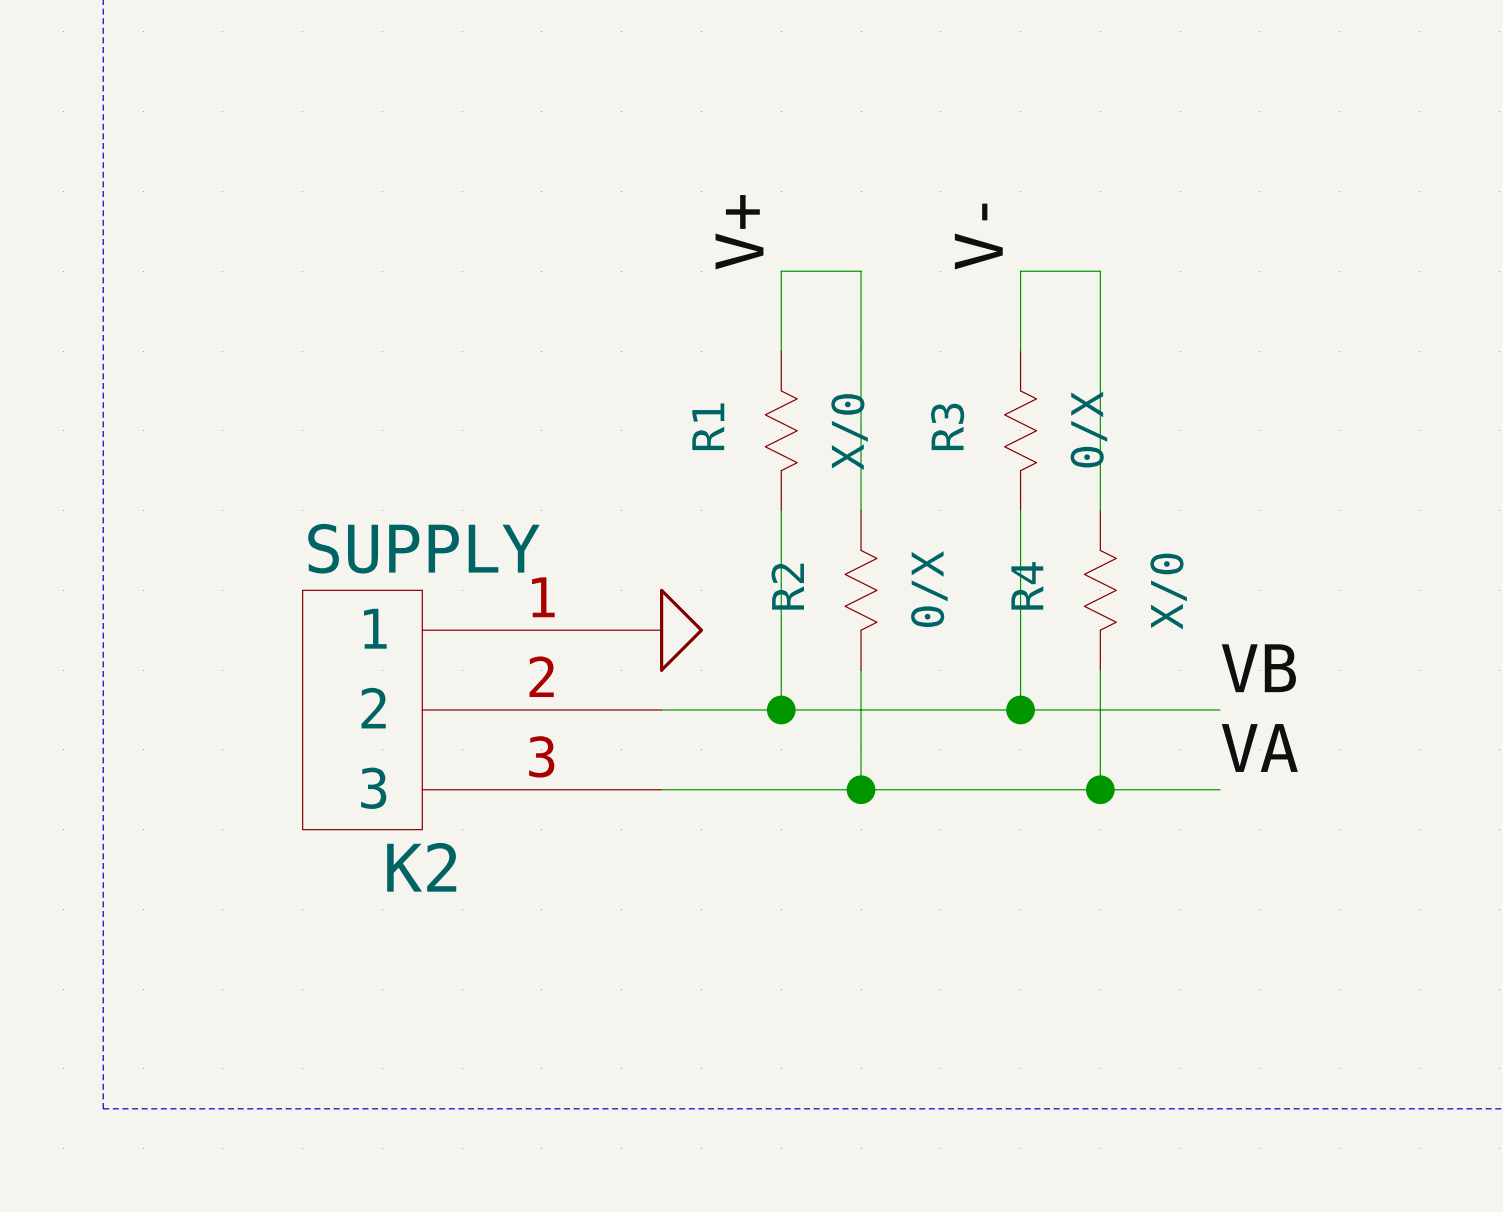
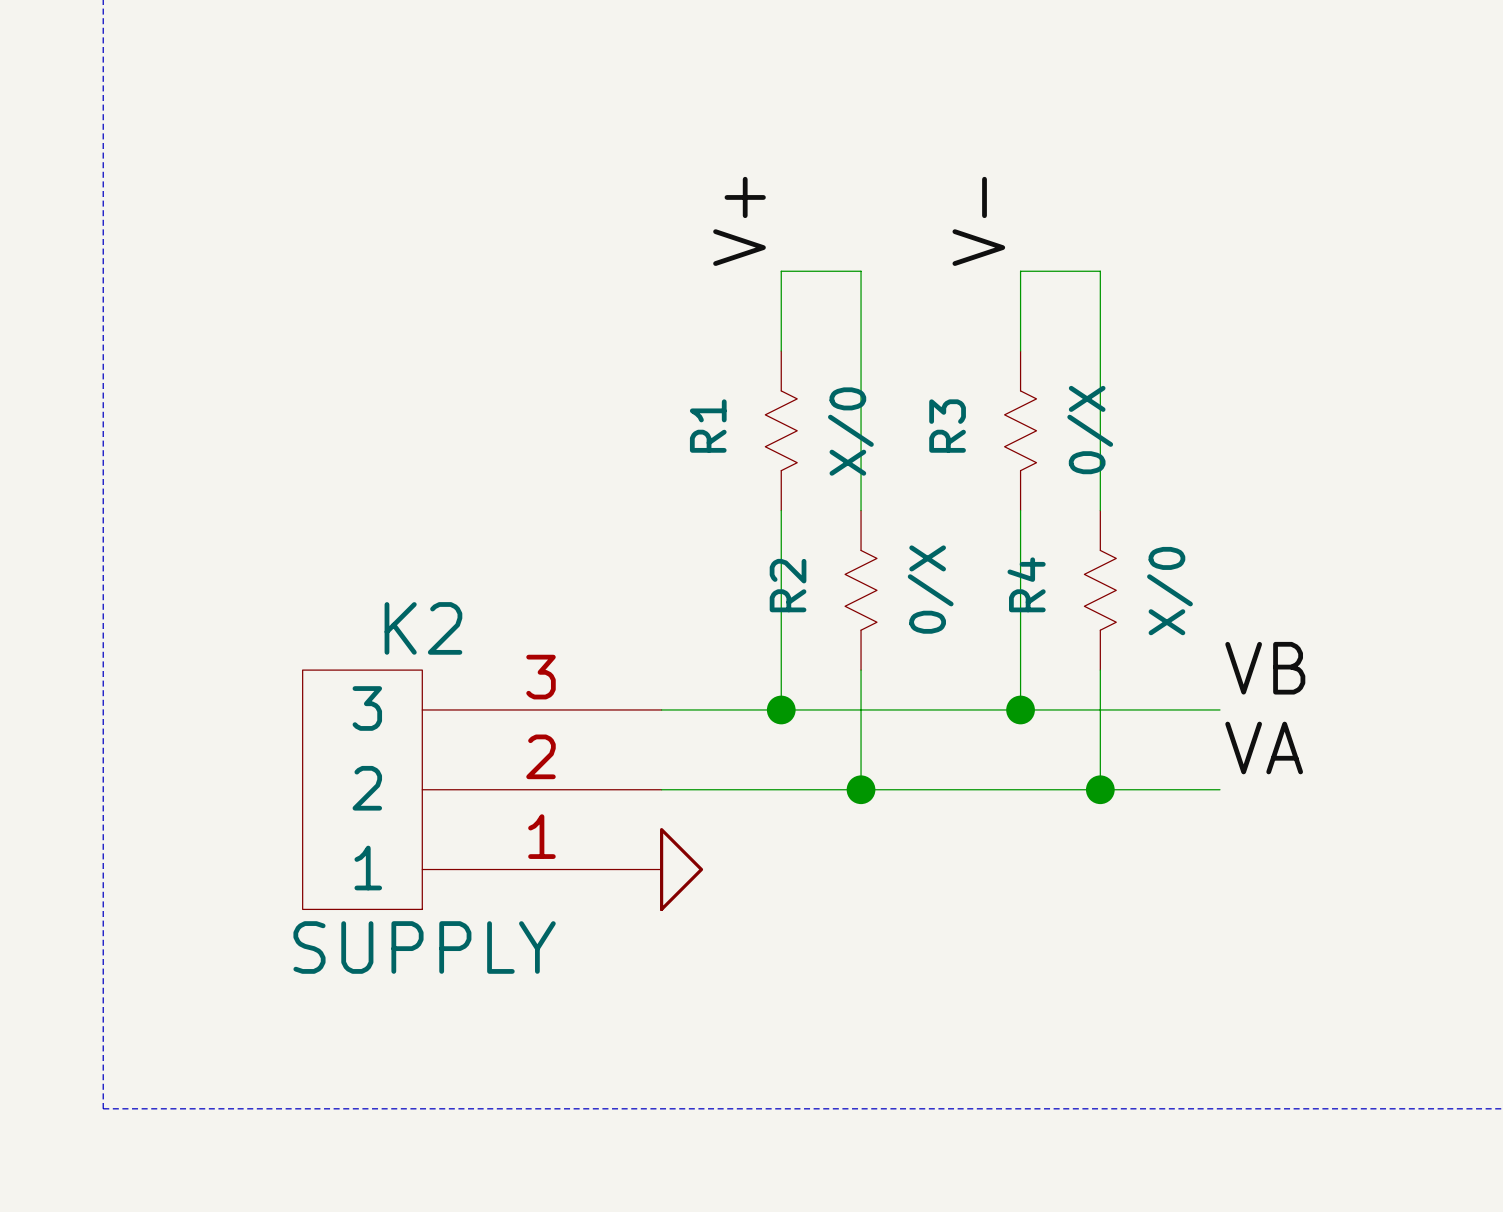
power symbol position: (681, 630) -> (681, 869)
K2 flip: as is (362, 709) -> up-down (362, 789)

